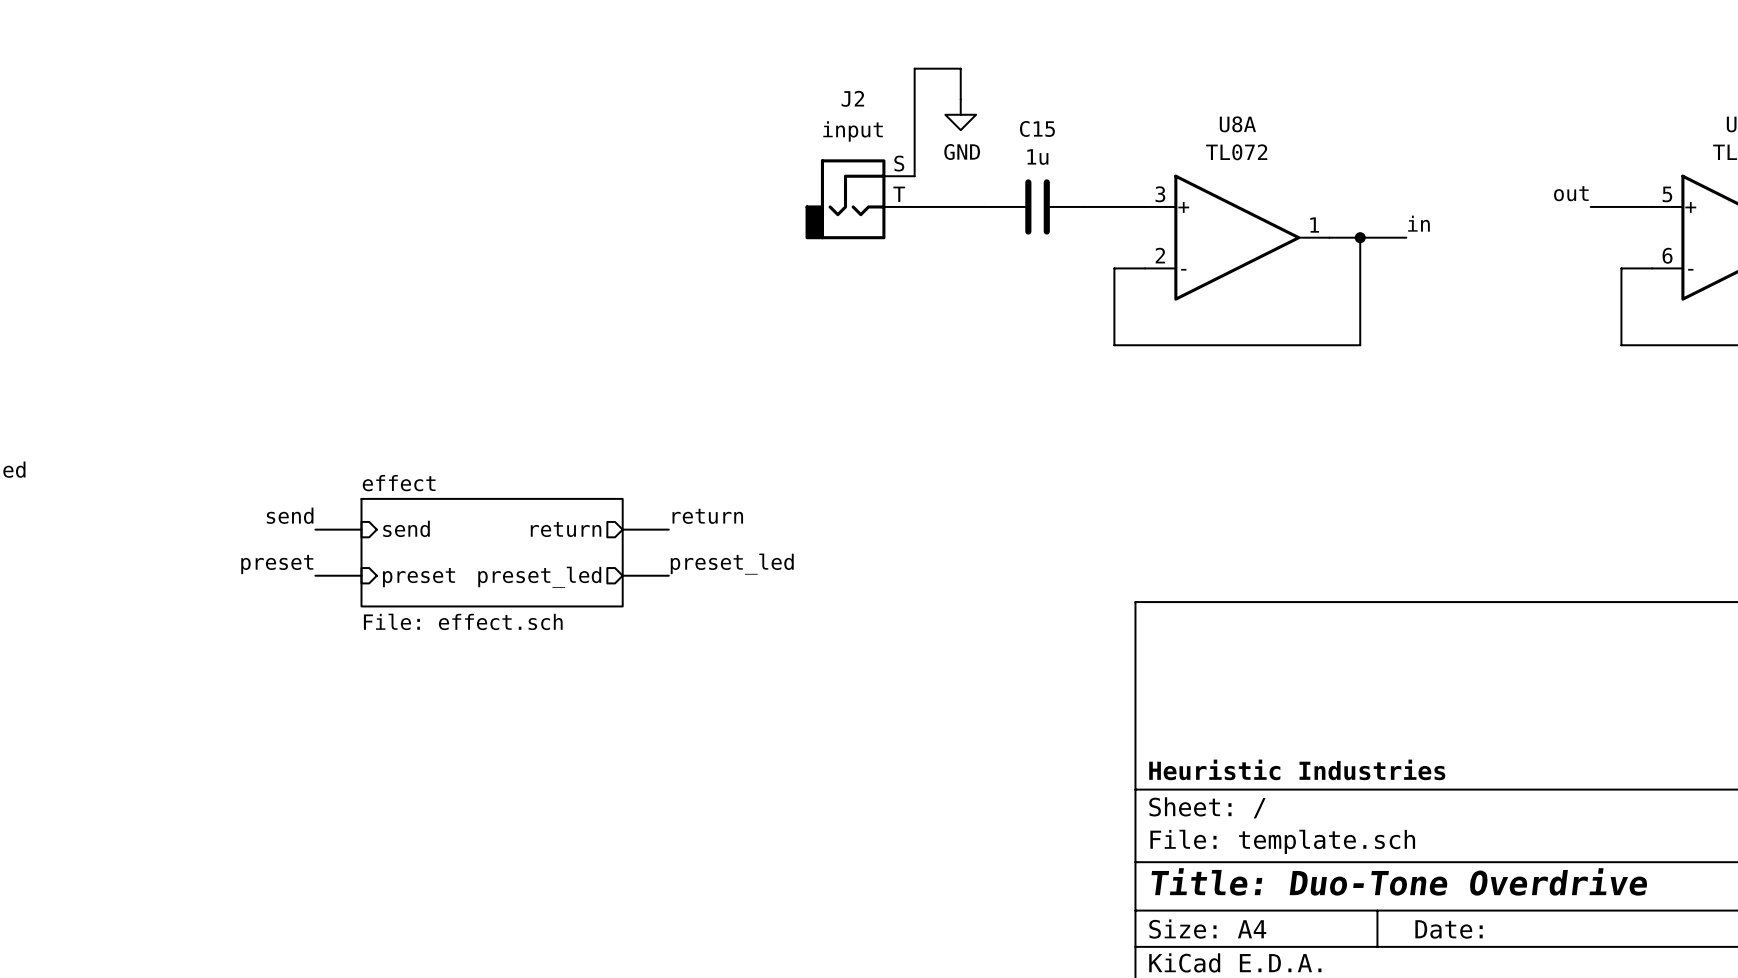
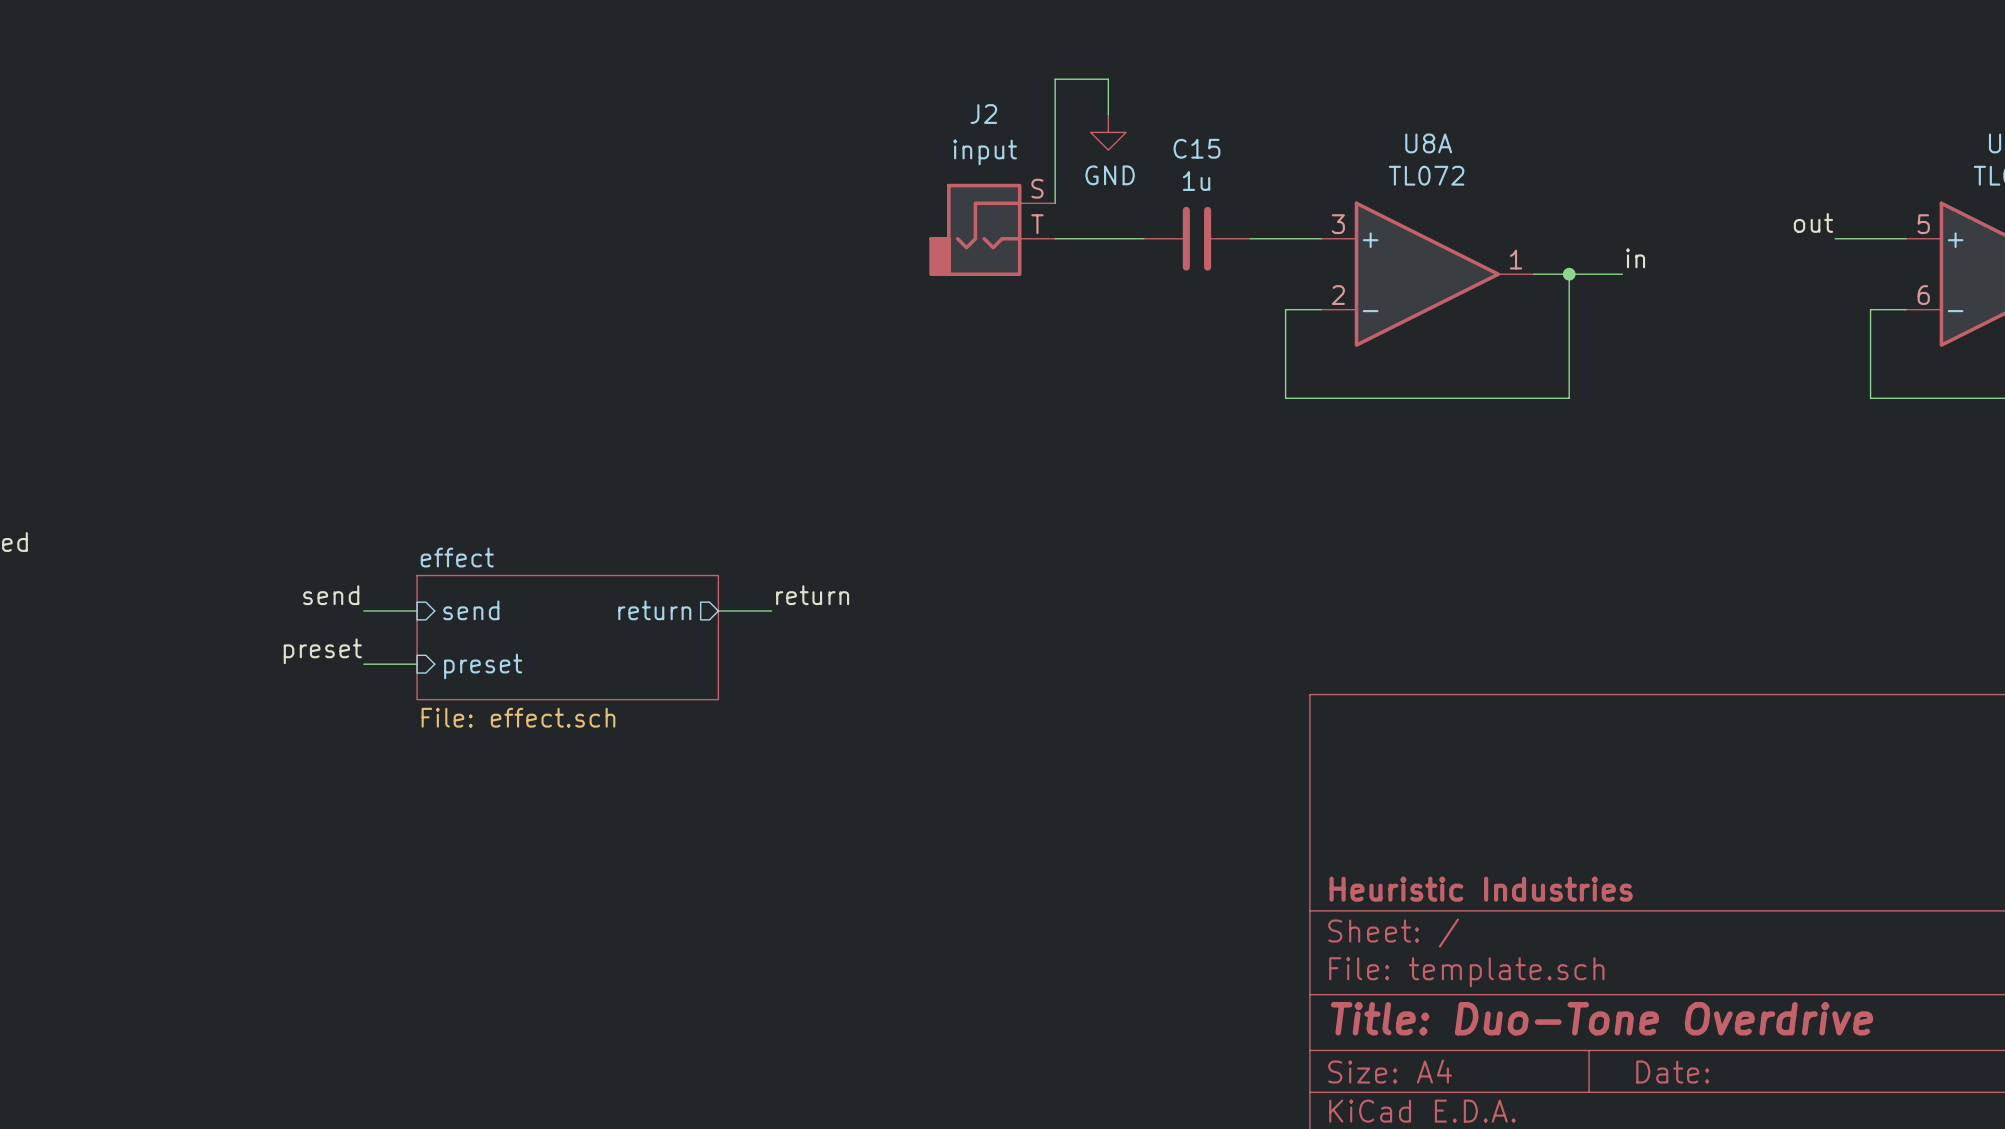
label: preset_led (732, 564) -> none
wire: (622, 575) (668, 575) -> none
sheet pin: preset_led (539, 577) -> none

